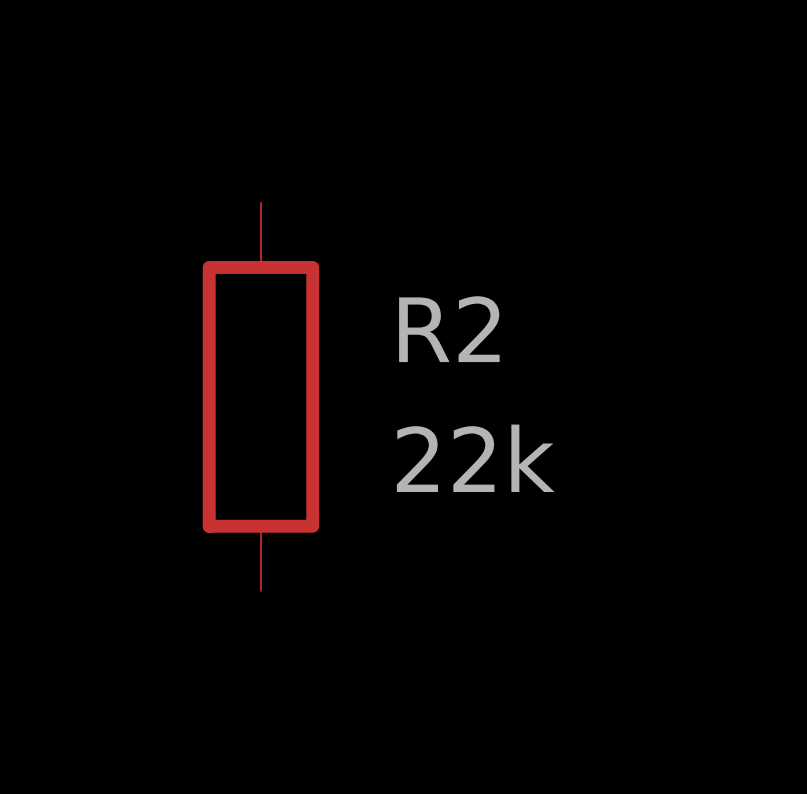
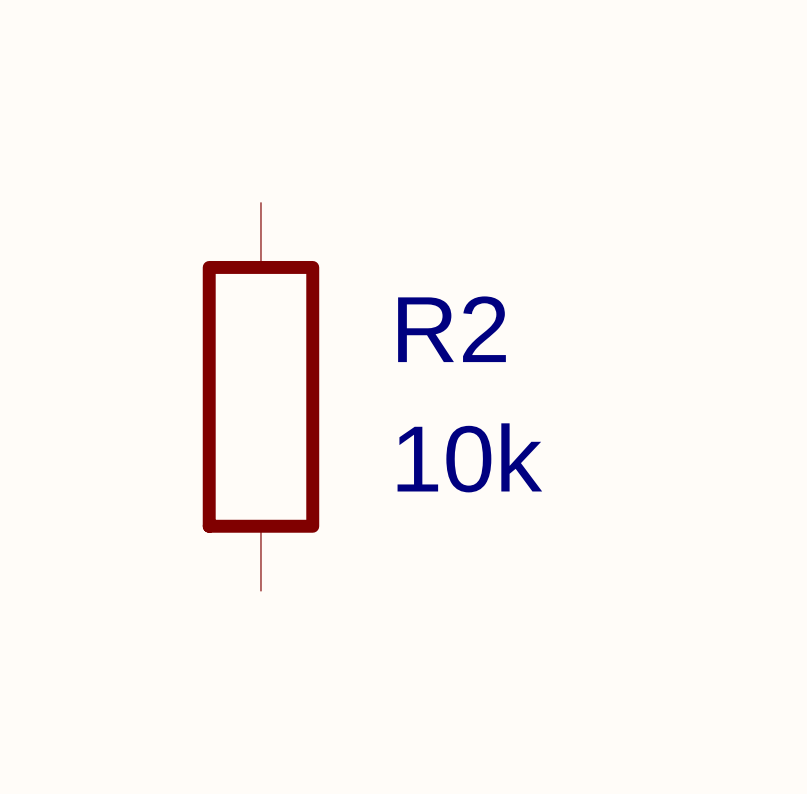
R2 value: 22k (475, 458) -> 10k (469, 457)

